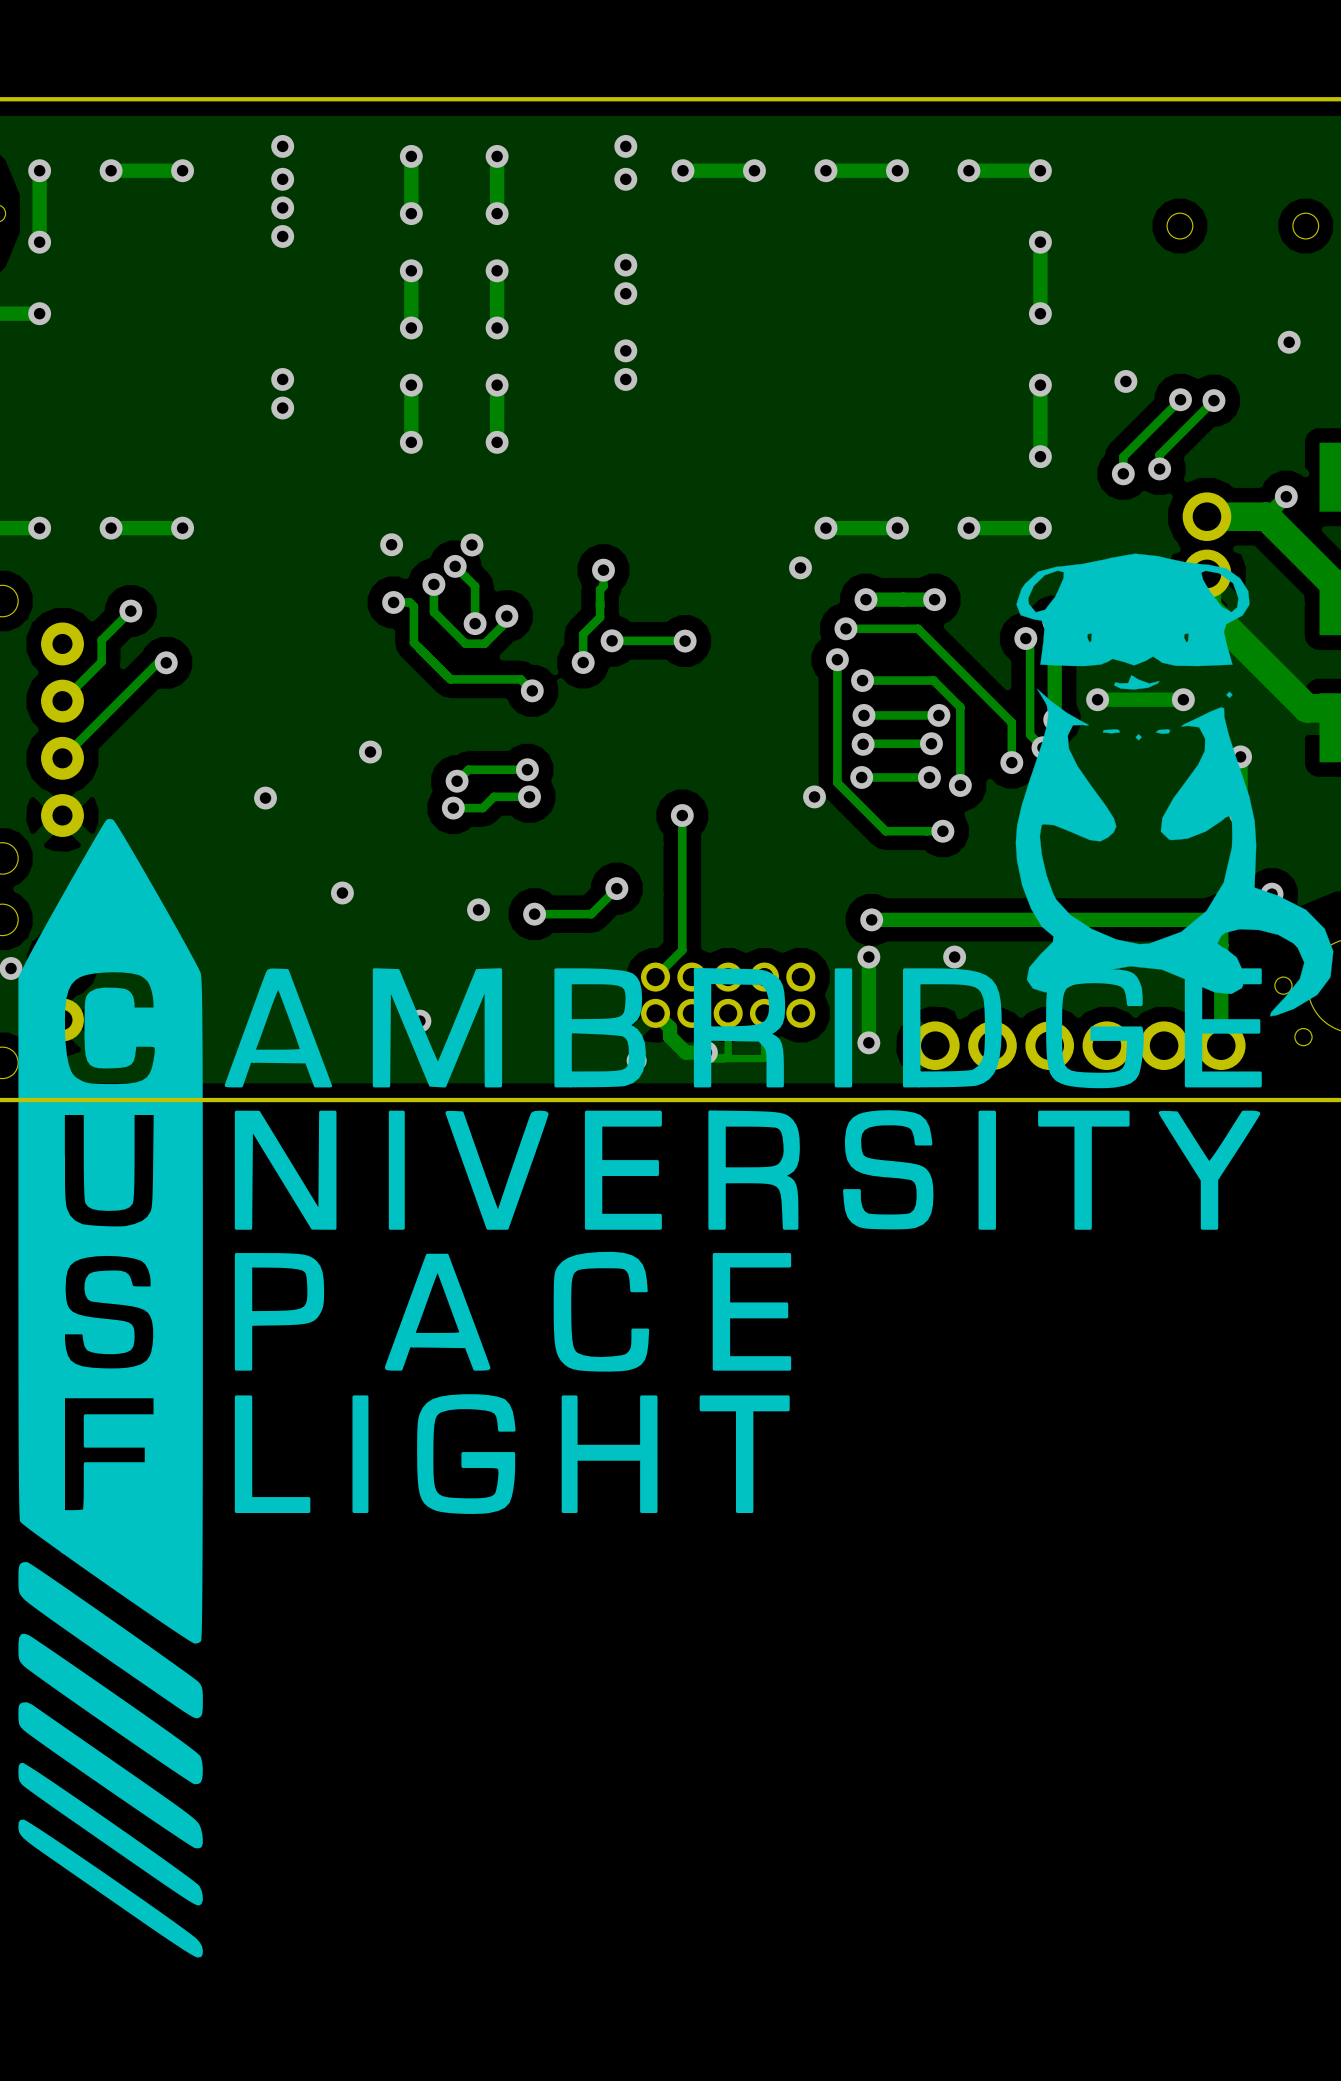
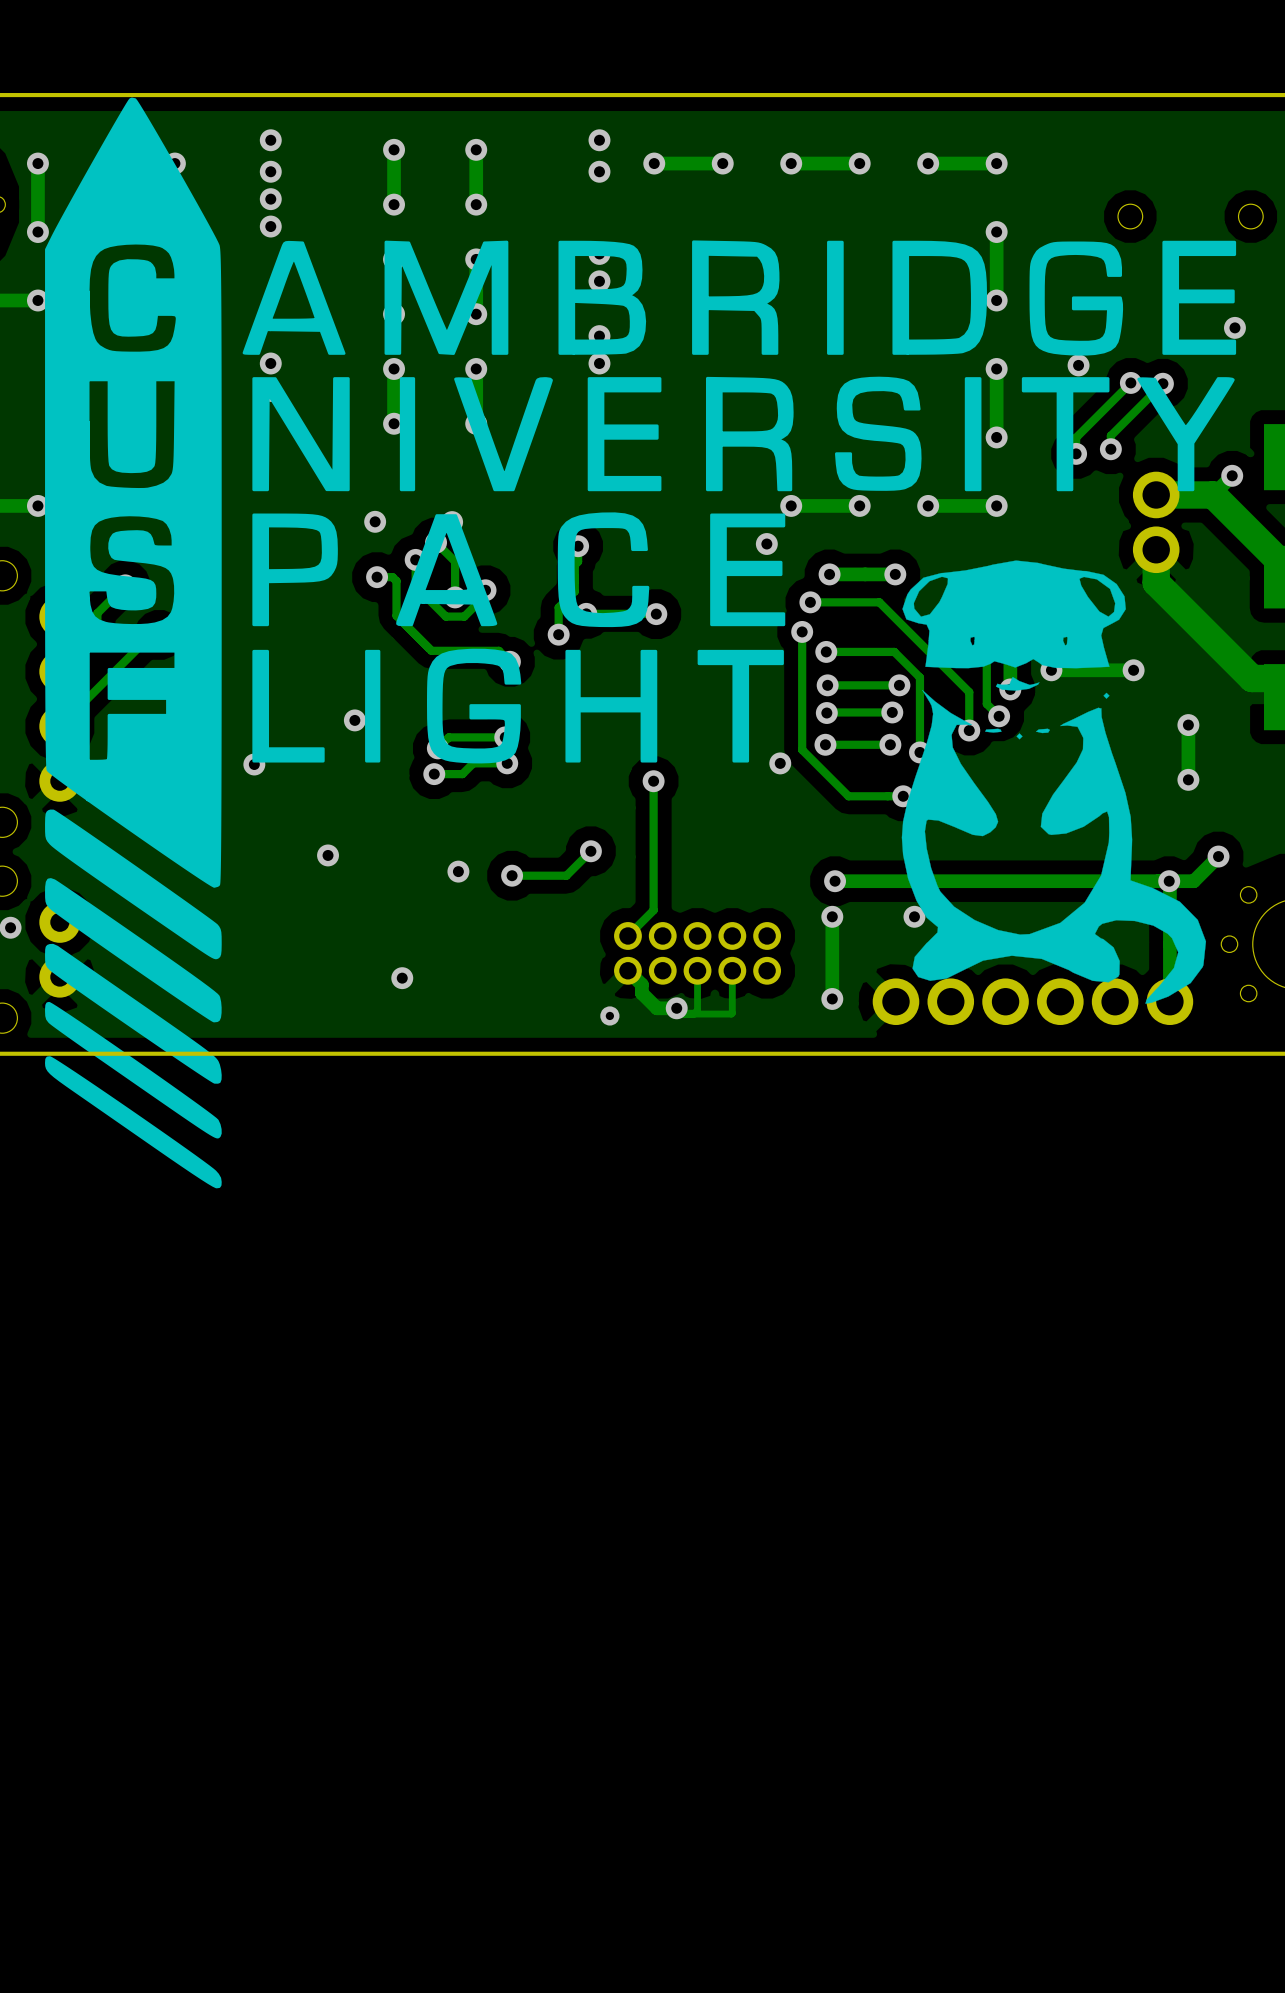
drawing: none -> [45, 97, 1237, 1189]
drawing position: (1174, 785) -> (1053, 782)
drawing: [18, 818, 1262, 1958] -> none

